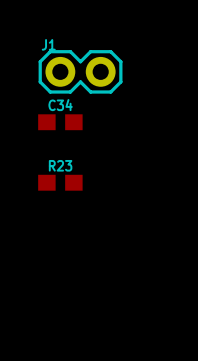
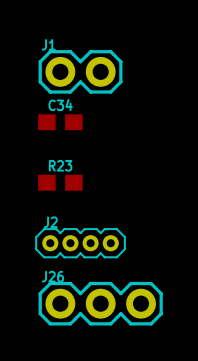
J2: none -> (80, 243)
J26: none -> (100, 303)

